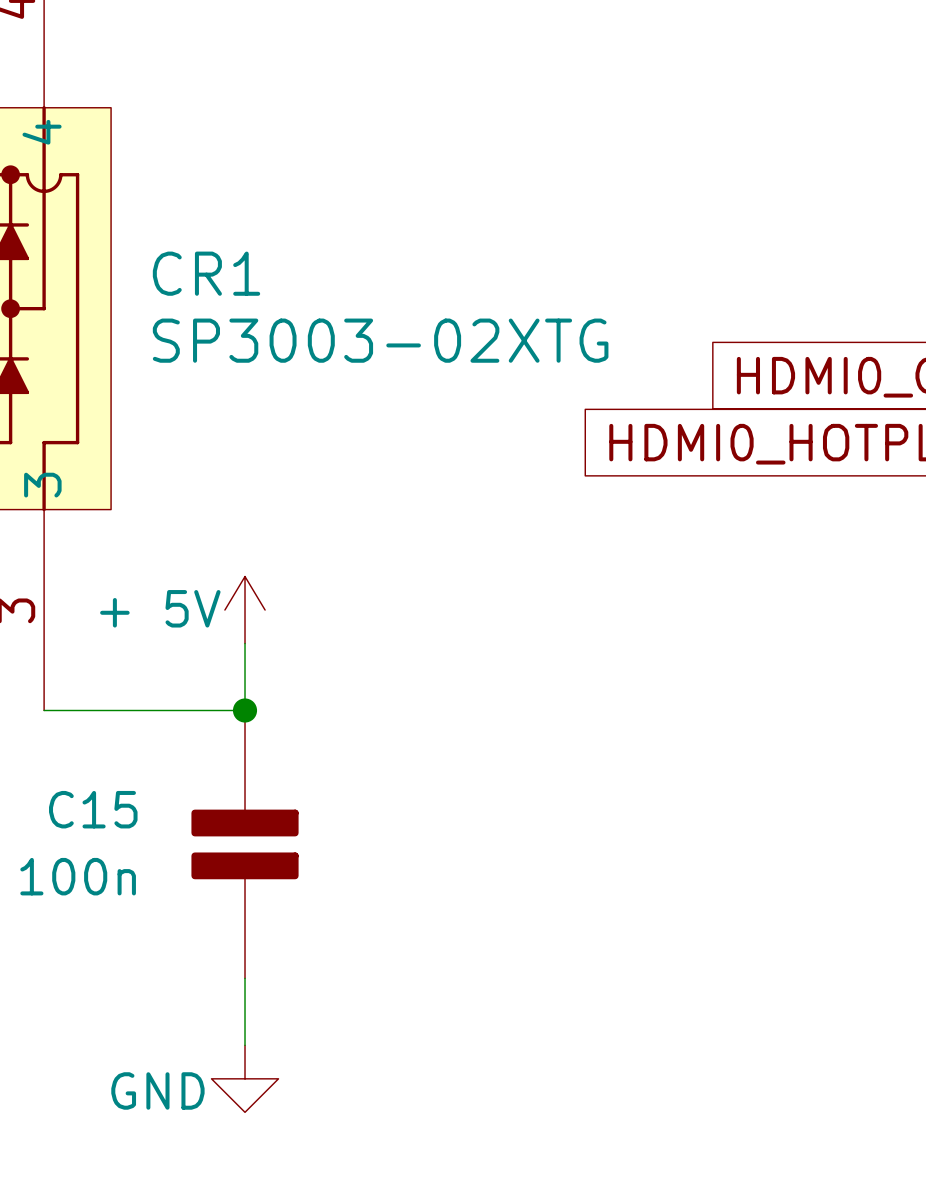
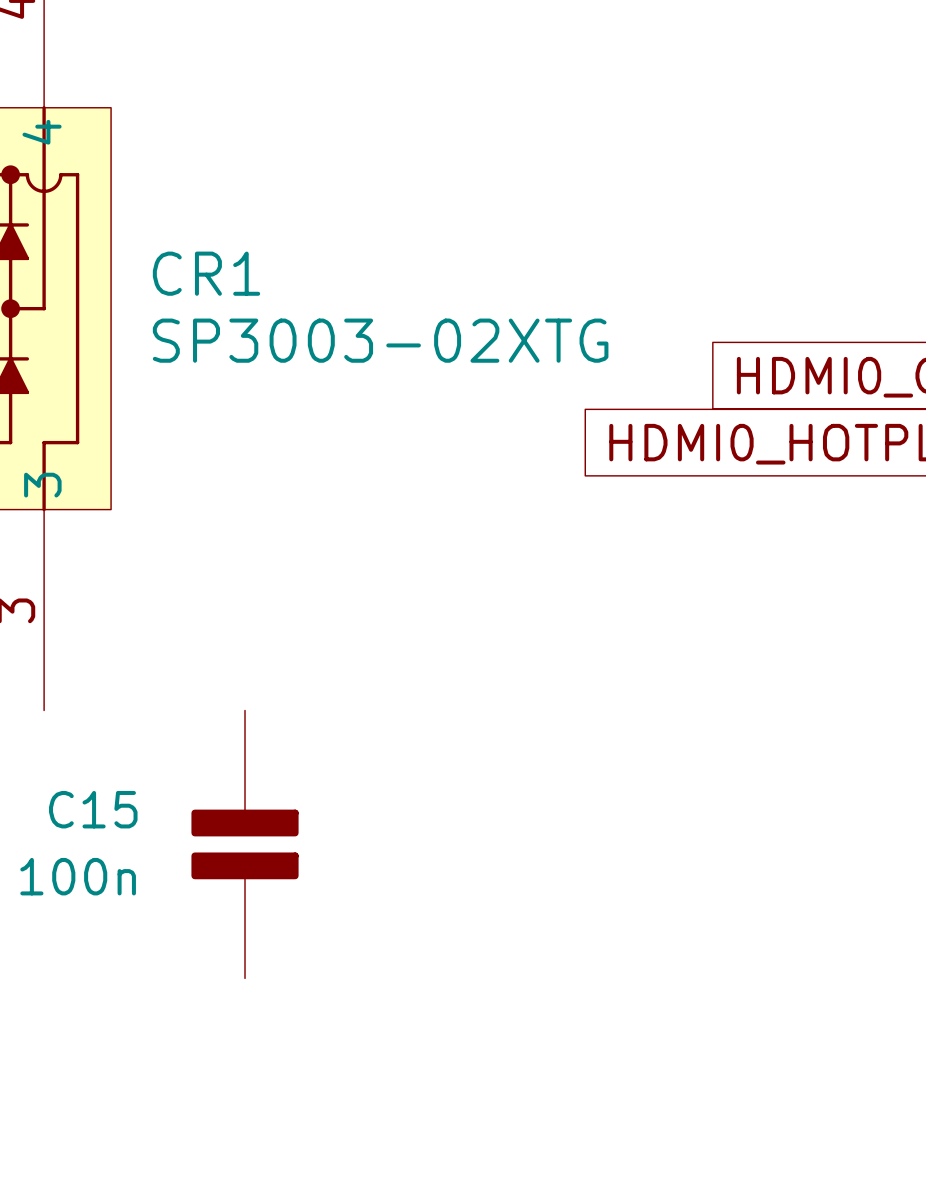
power symbol: + 5V (245, 610) -> none
wire: (245, 643) (245, 710) (44, 710) -> none
junction: (245, 710) -> none
wire: (245, 978) (245, 1045) -> none
power symbol: GND (245, 1078) -> none

